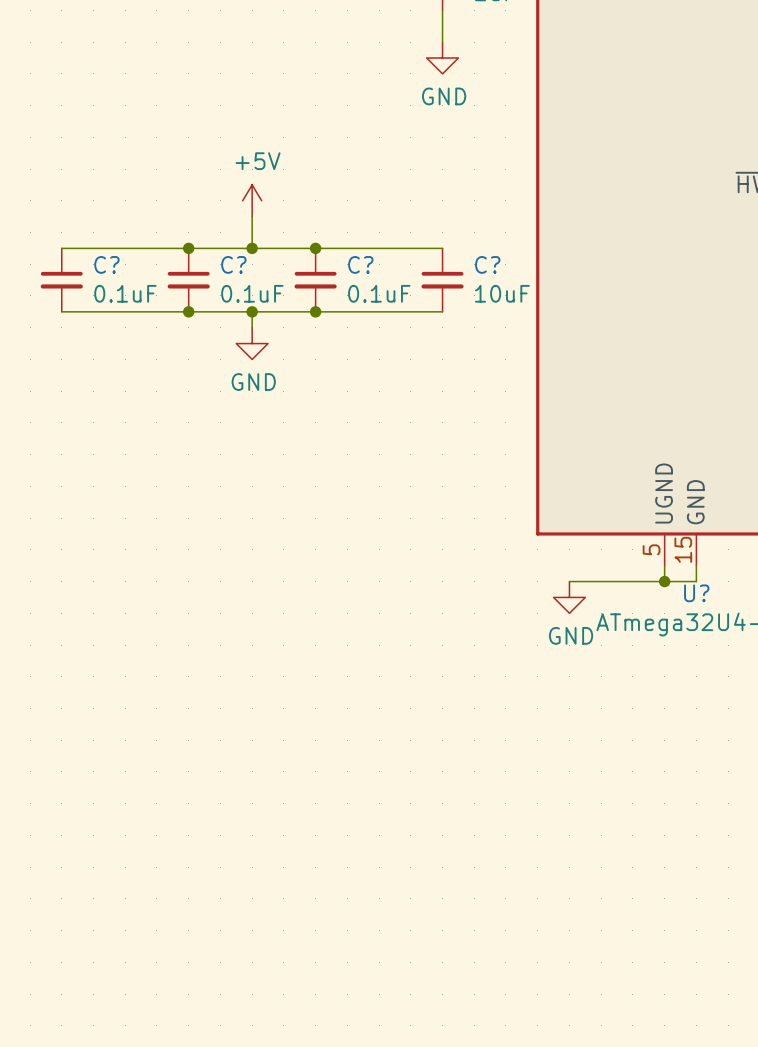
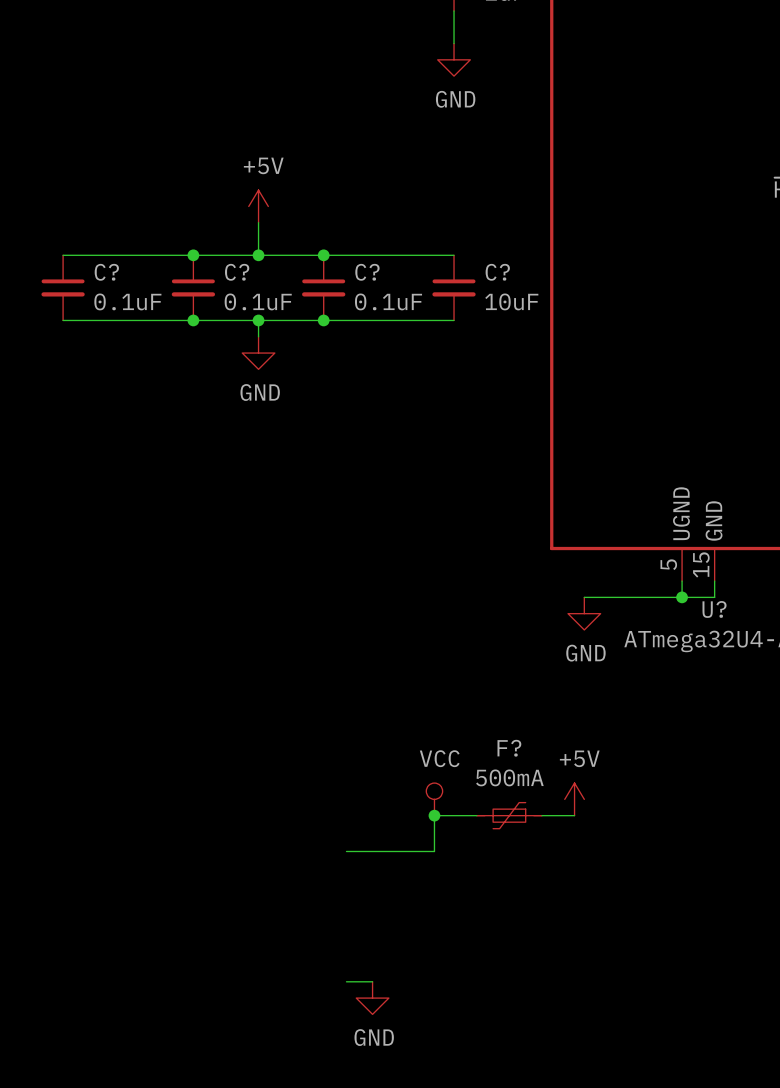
power symbol: none -> VCC (434, 799)
power symbol: none -> +5V (574, 799)
junction: none -> (434, 815)
wire: none -> (476, 815) (434, 815) (434, 851) (346, 851)
F?: none -> 500mA (509, 815)
wire: none -> (541, 815) (574, 815)
wire: none -> (346, 981) (372, 981)
power symbol: none -> GND (372, 998)

